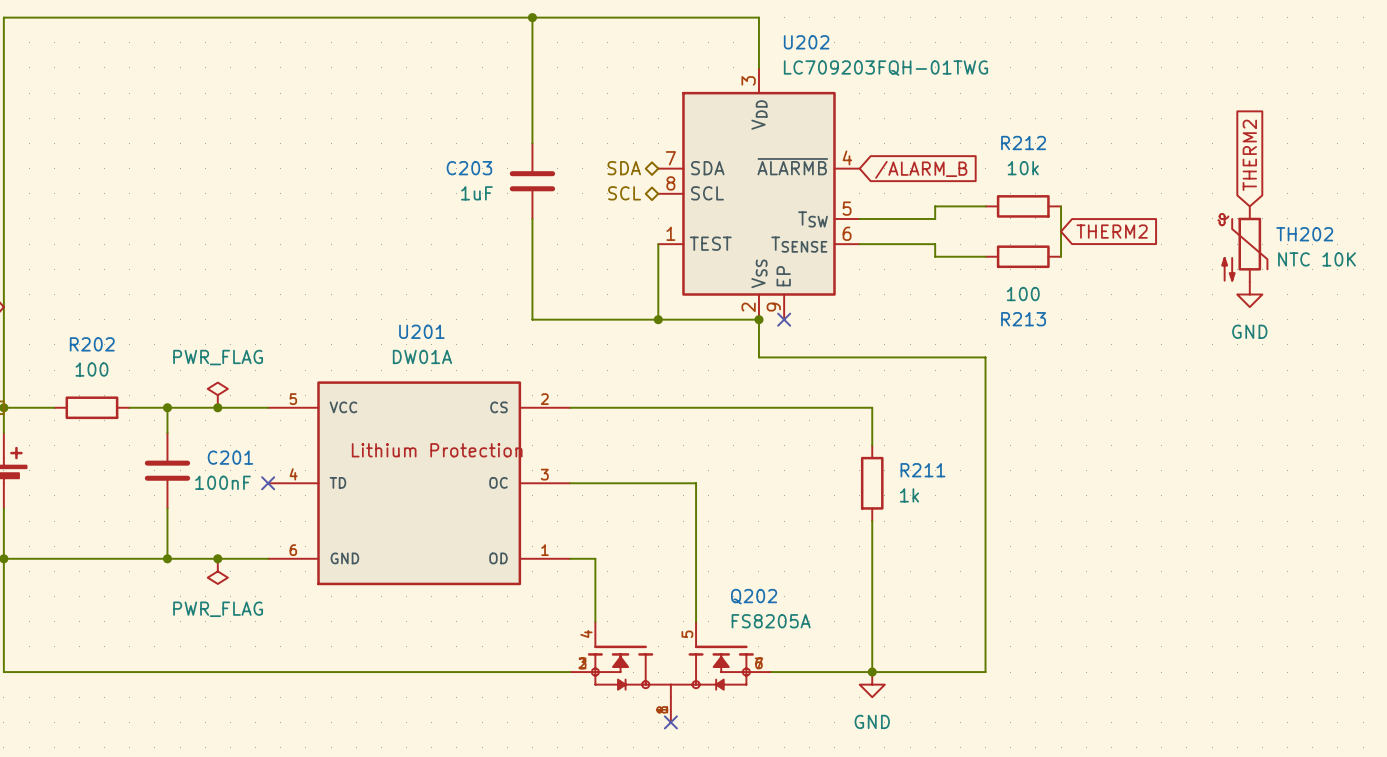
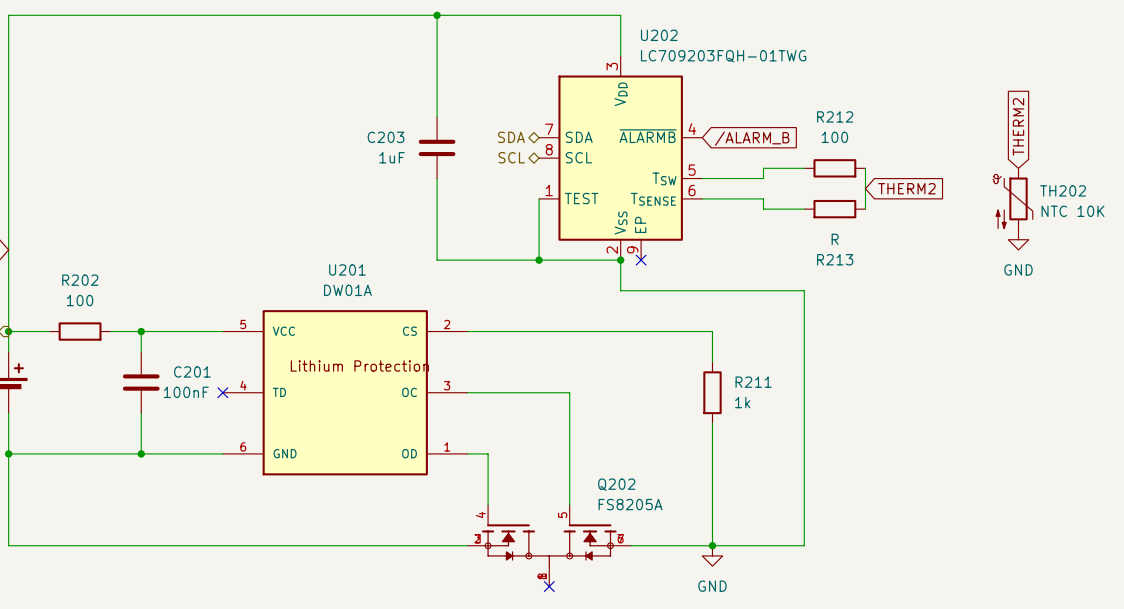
R212 value: 10k (1023, 168) -> 100 (834, 137)
R213 value: 100 (1023, 294) -> R (835, 239)
power symbol: PWR_FLAG (217, 395) -> none
junction: (217, 407) -> none
junction: (217, 558) -> none
power symbol: PWR_FLAG (217, 571) -> none

